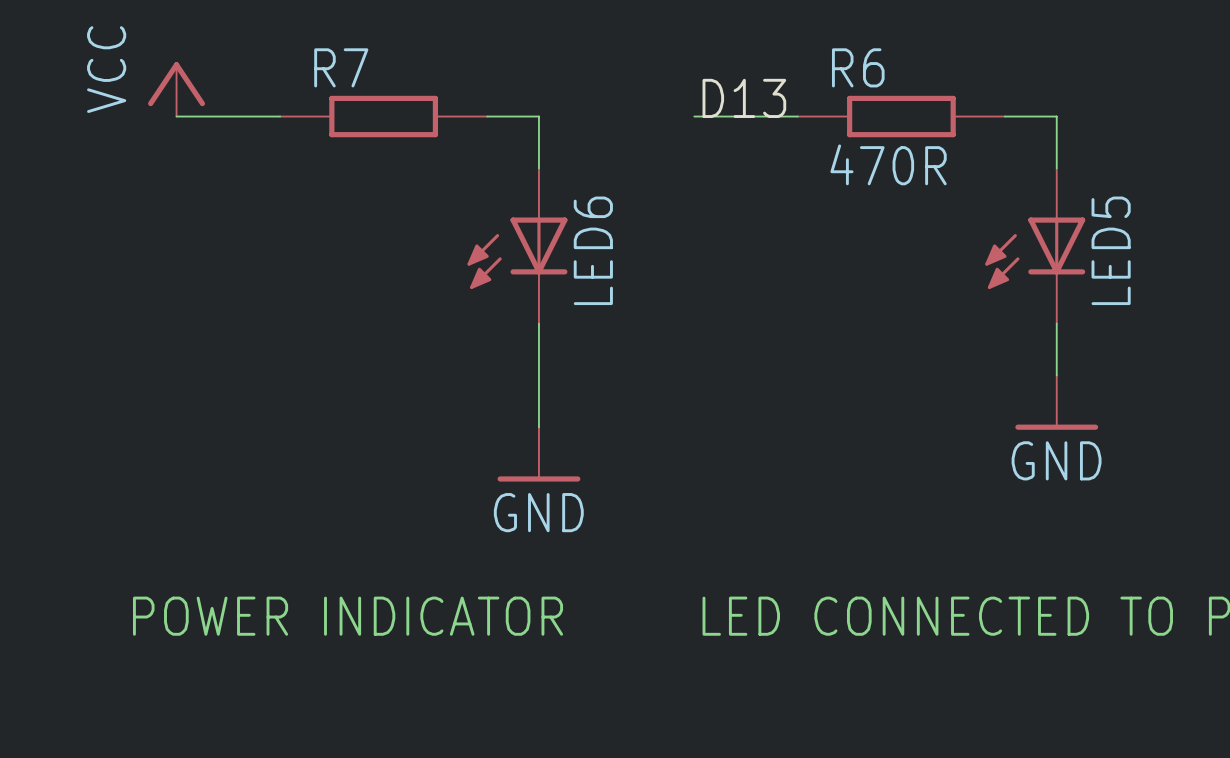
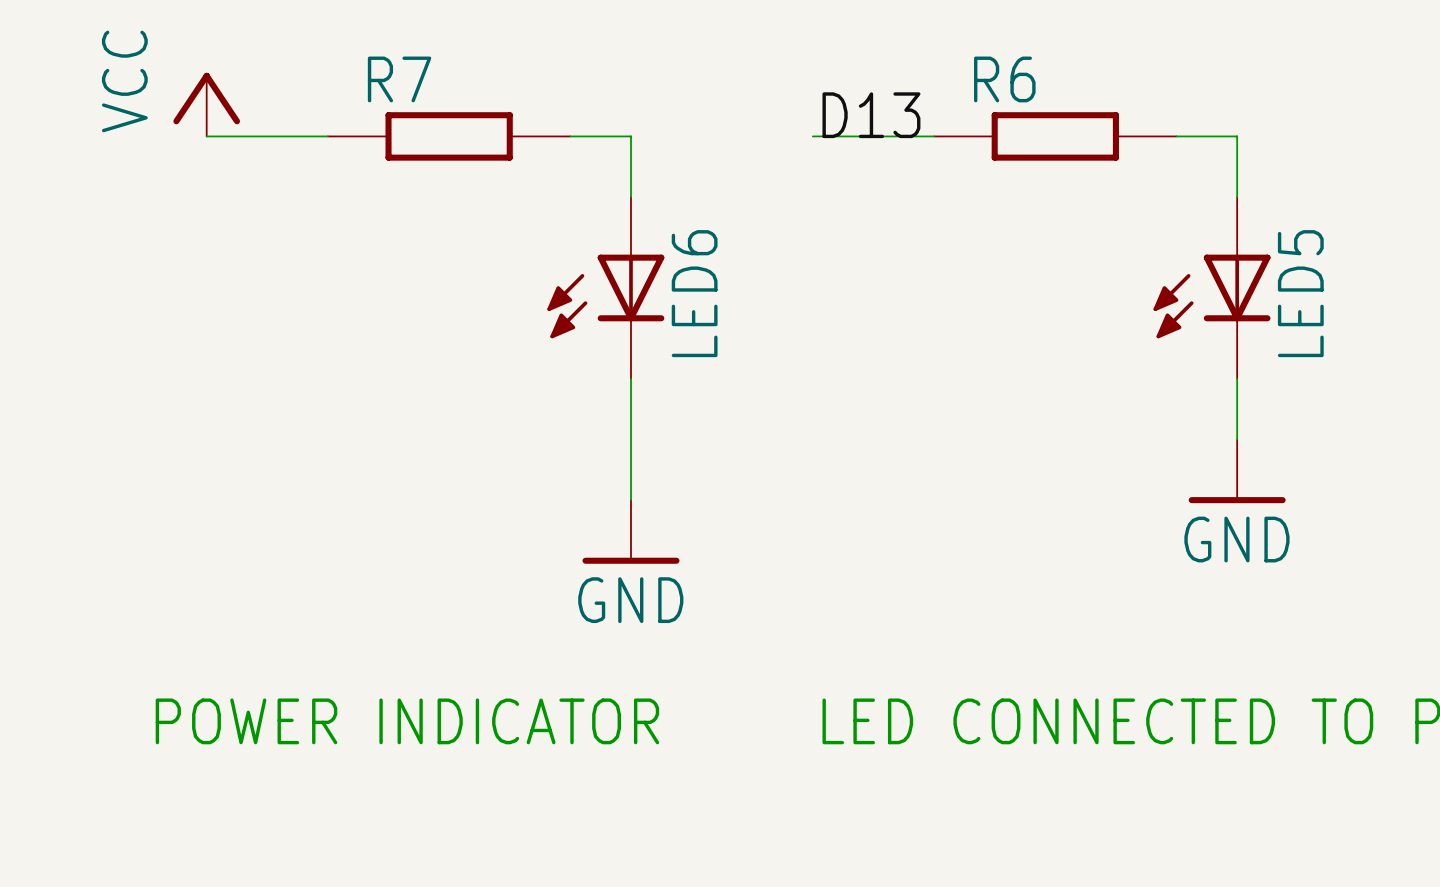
R6 value: 470R (888, 164) -> none

